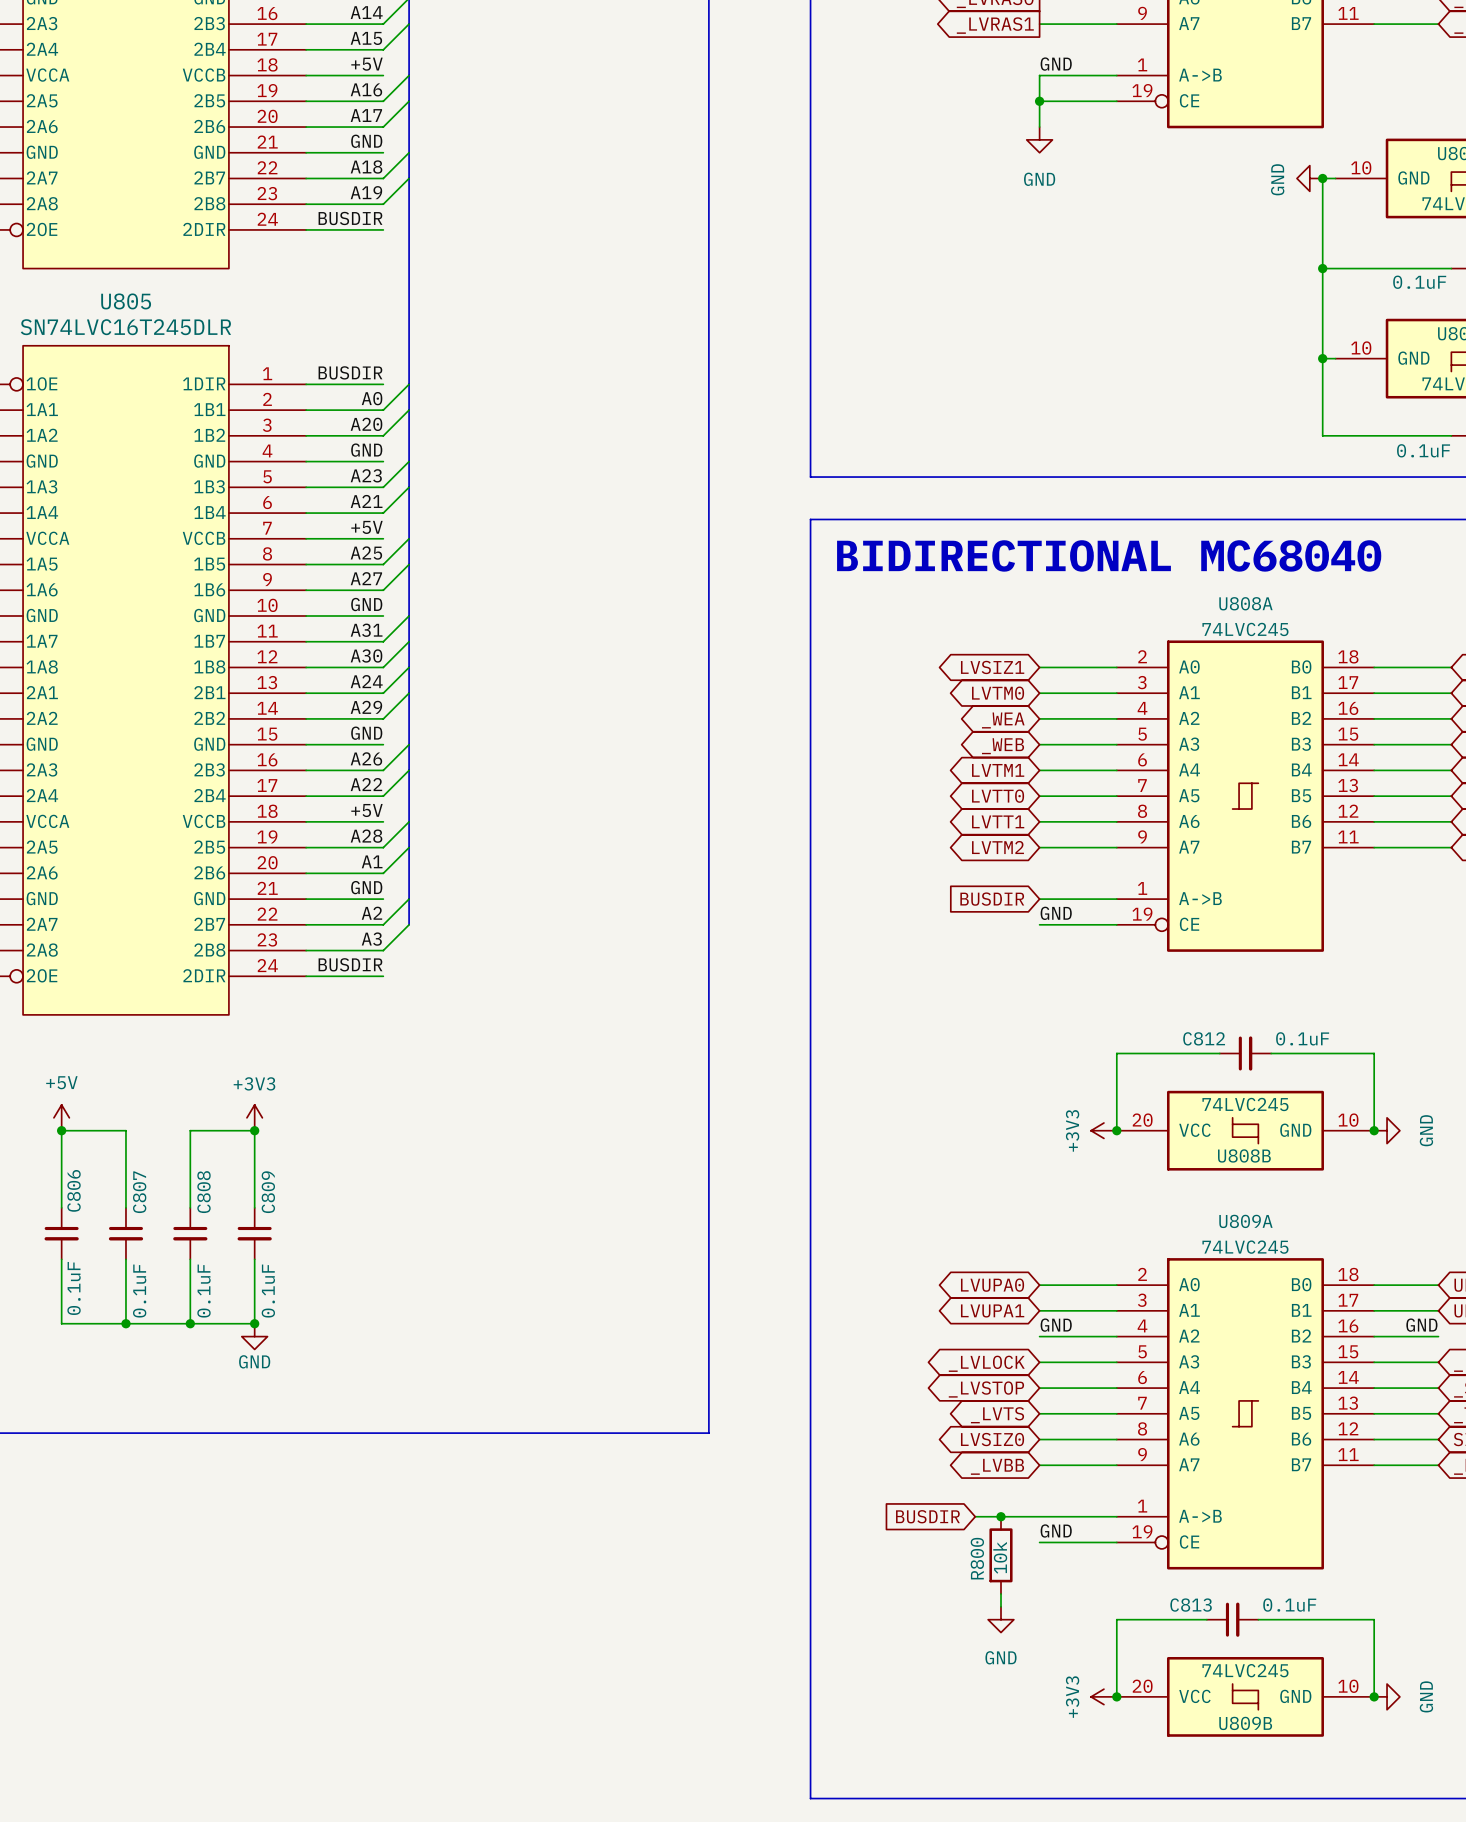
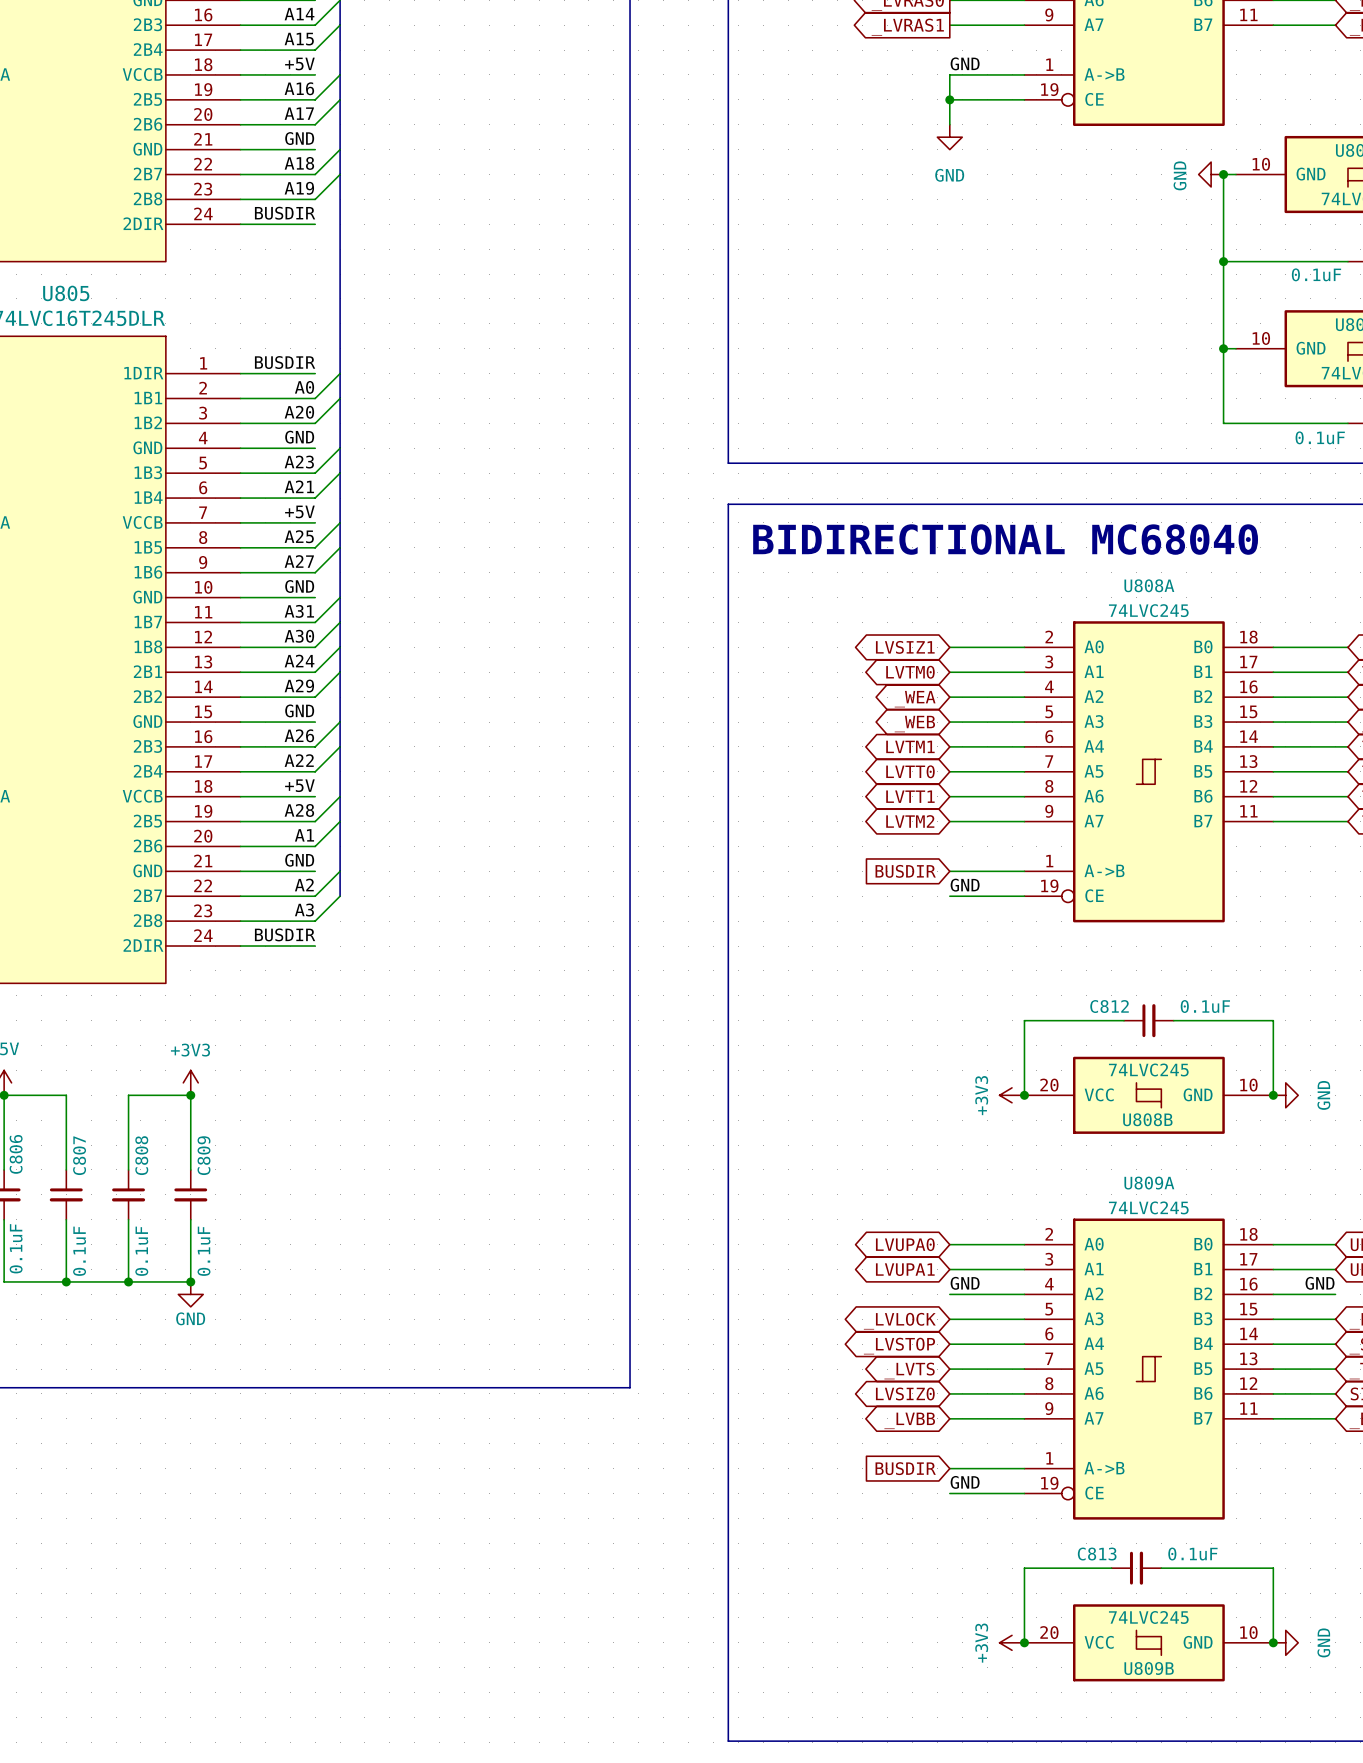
global label position: BUSDIR (927, 1516) -> BUSDIR (905, 1468)
wire: (975, 1516) (1039, 1516) -> none
junction: (1000, 1516) -> none
R800: 10k (1000, 1555) -> none
wire: (1000, 1593) (1000, 1606) -> none
power symbol: GND (1000, 1619) -> none

